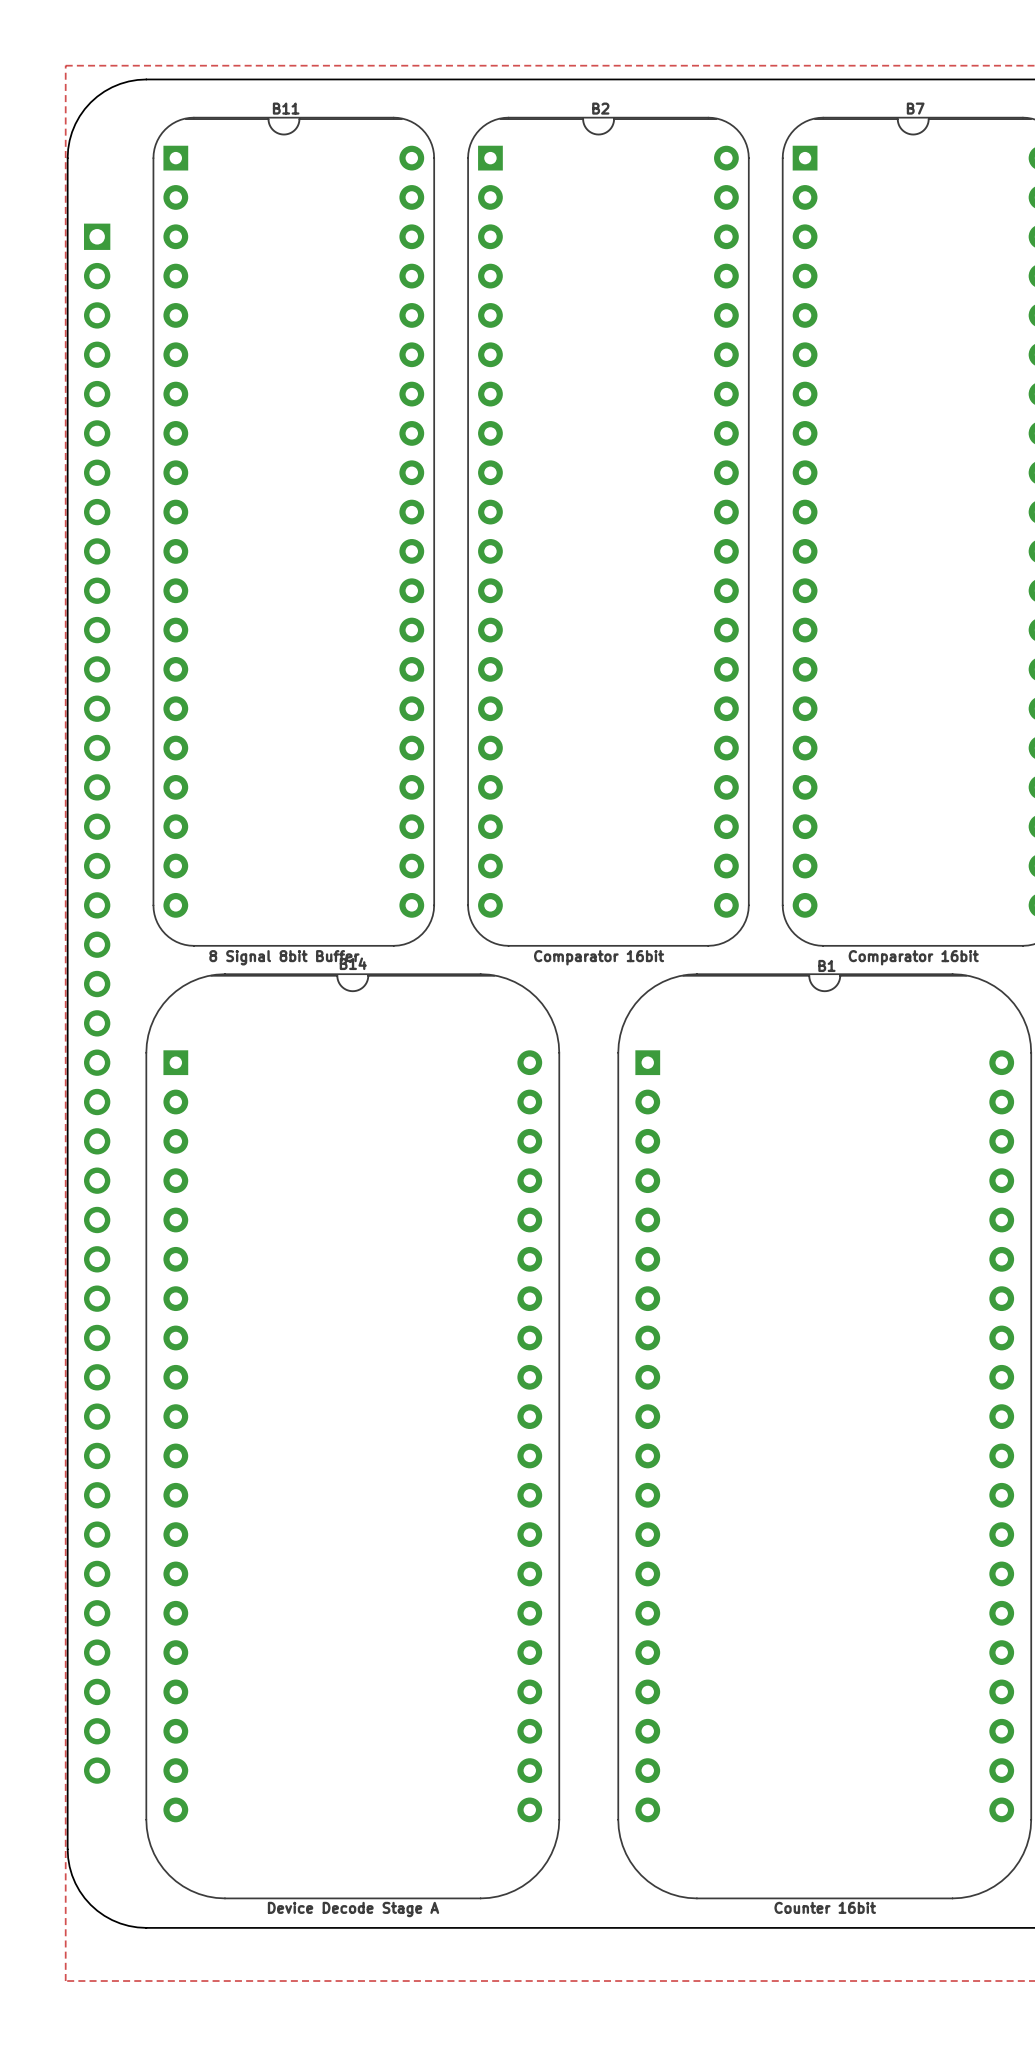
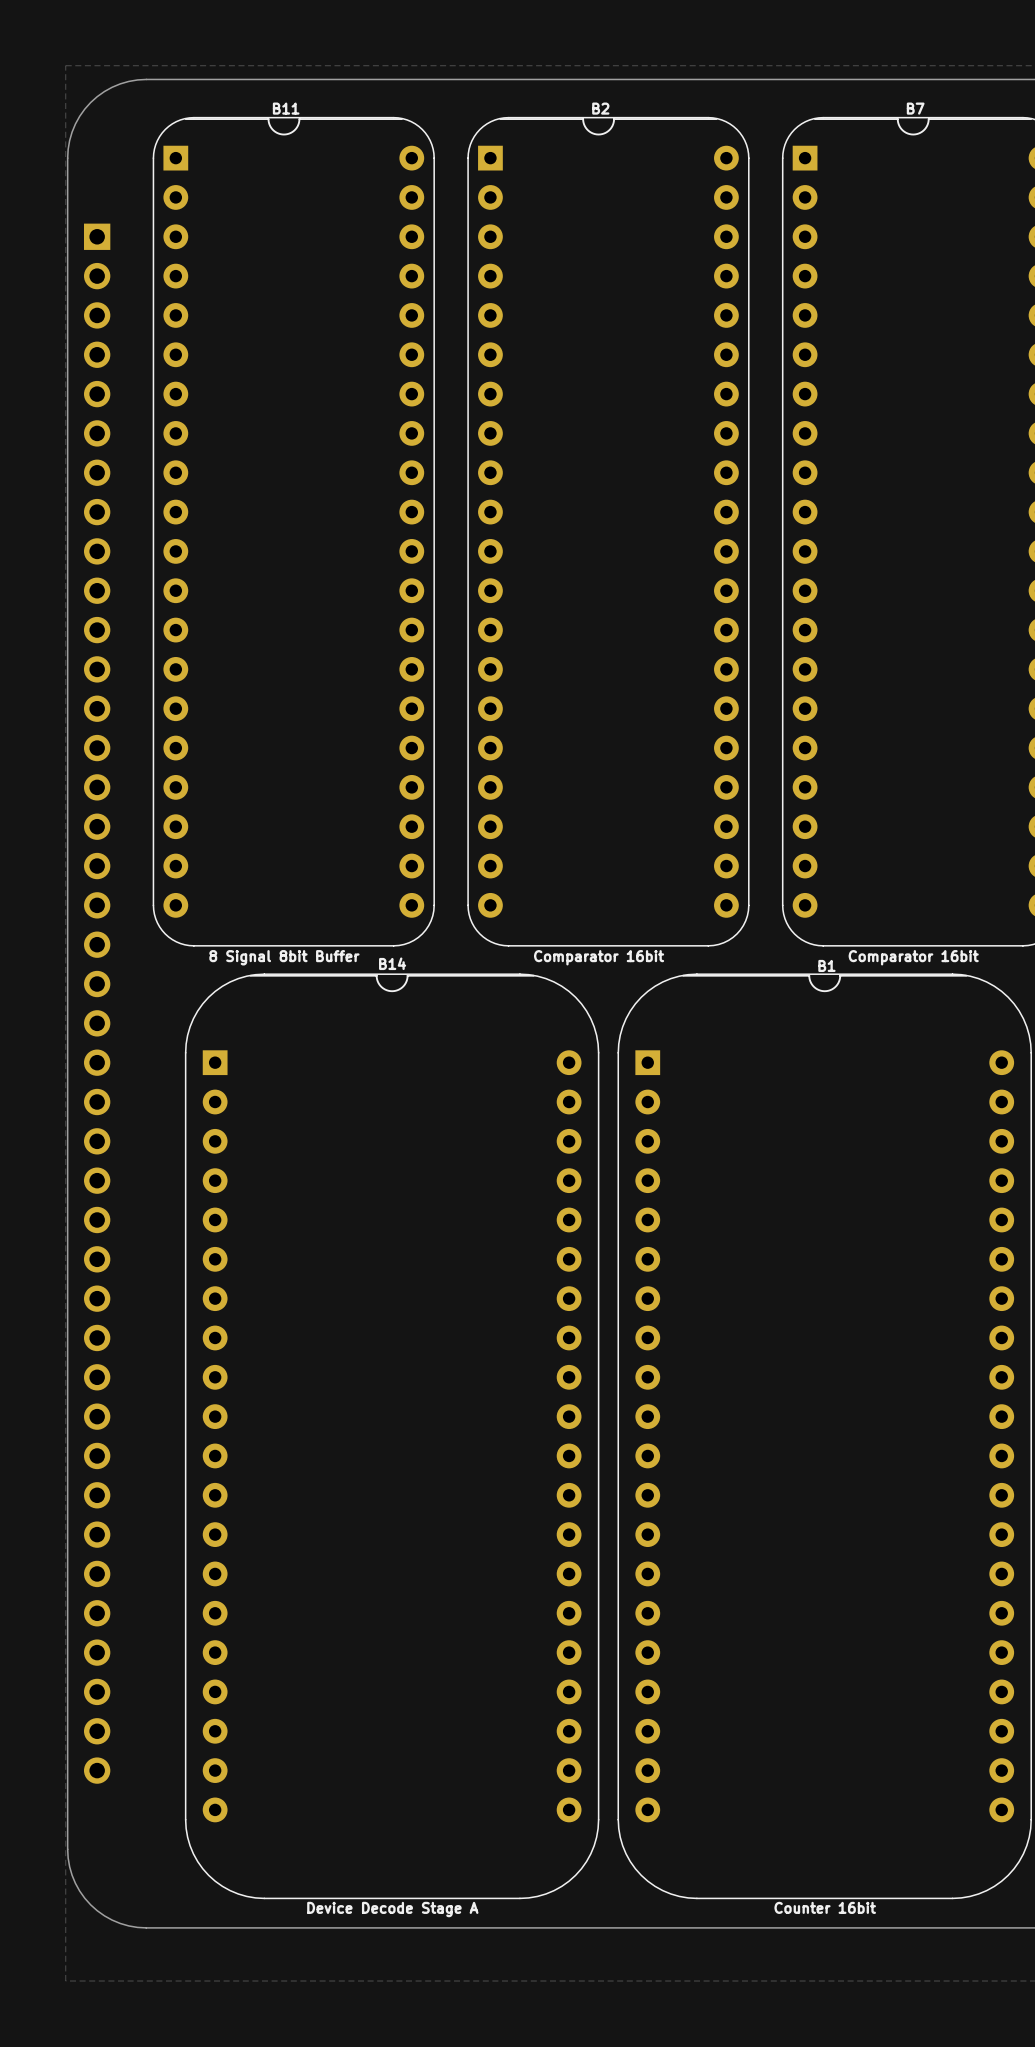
B14 position: (352, 1436) -> (392, 1436)

